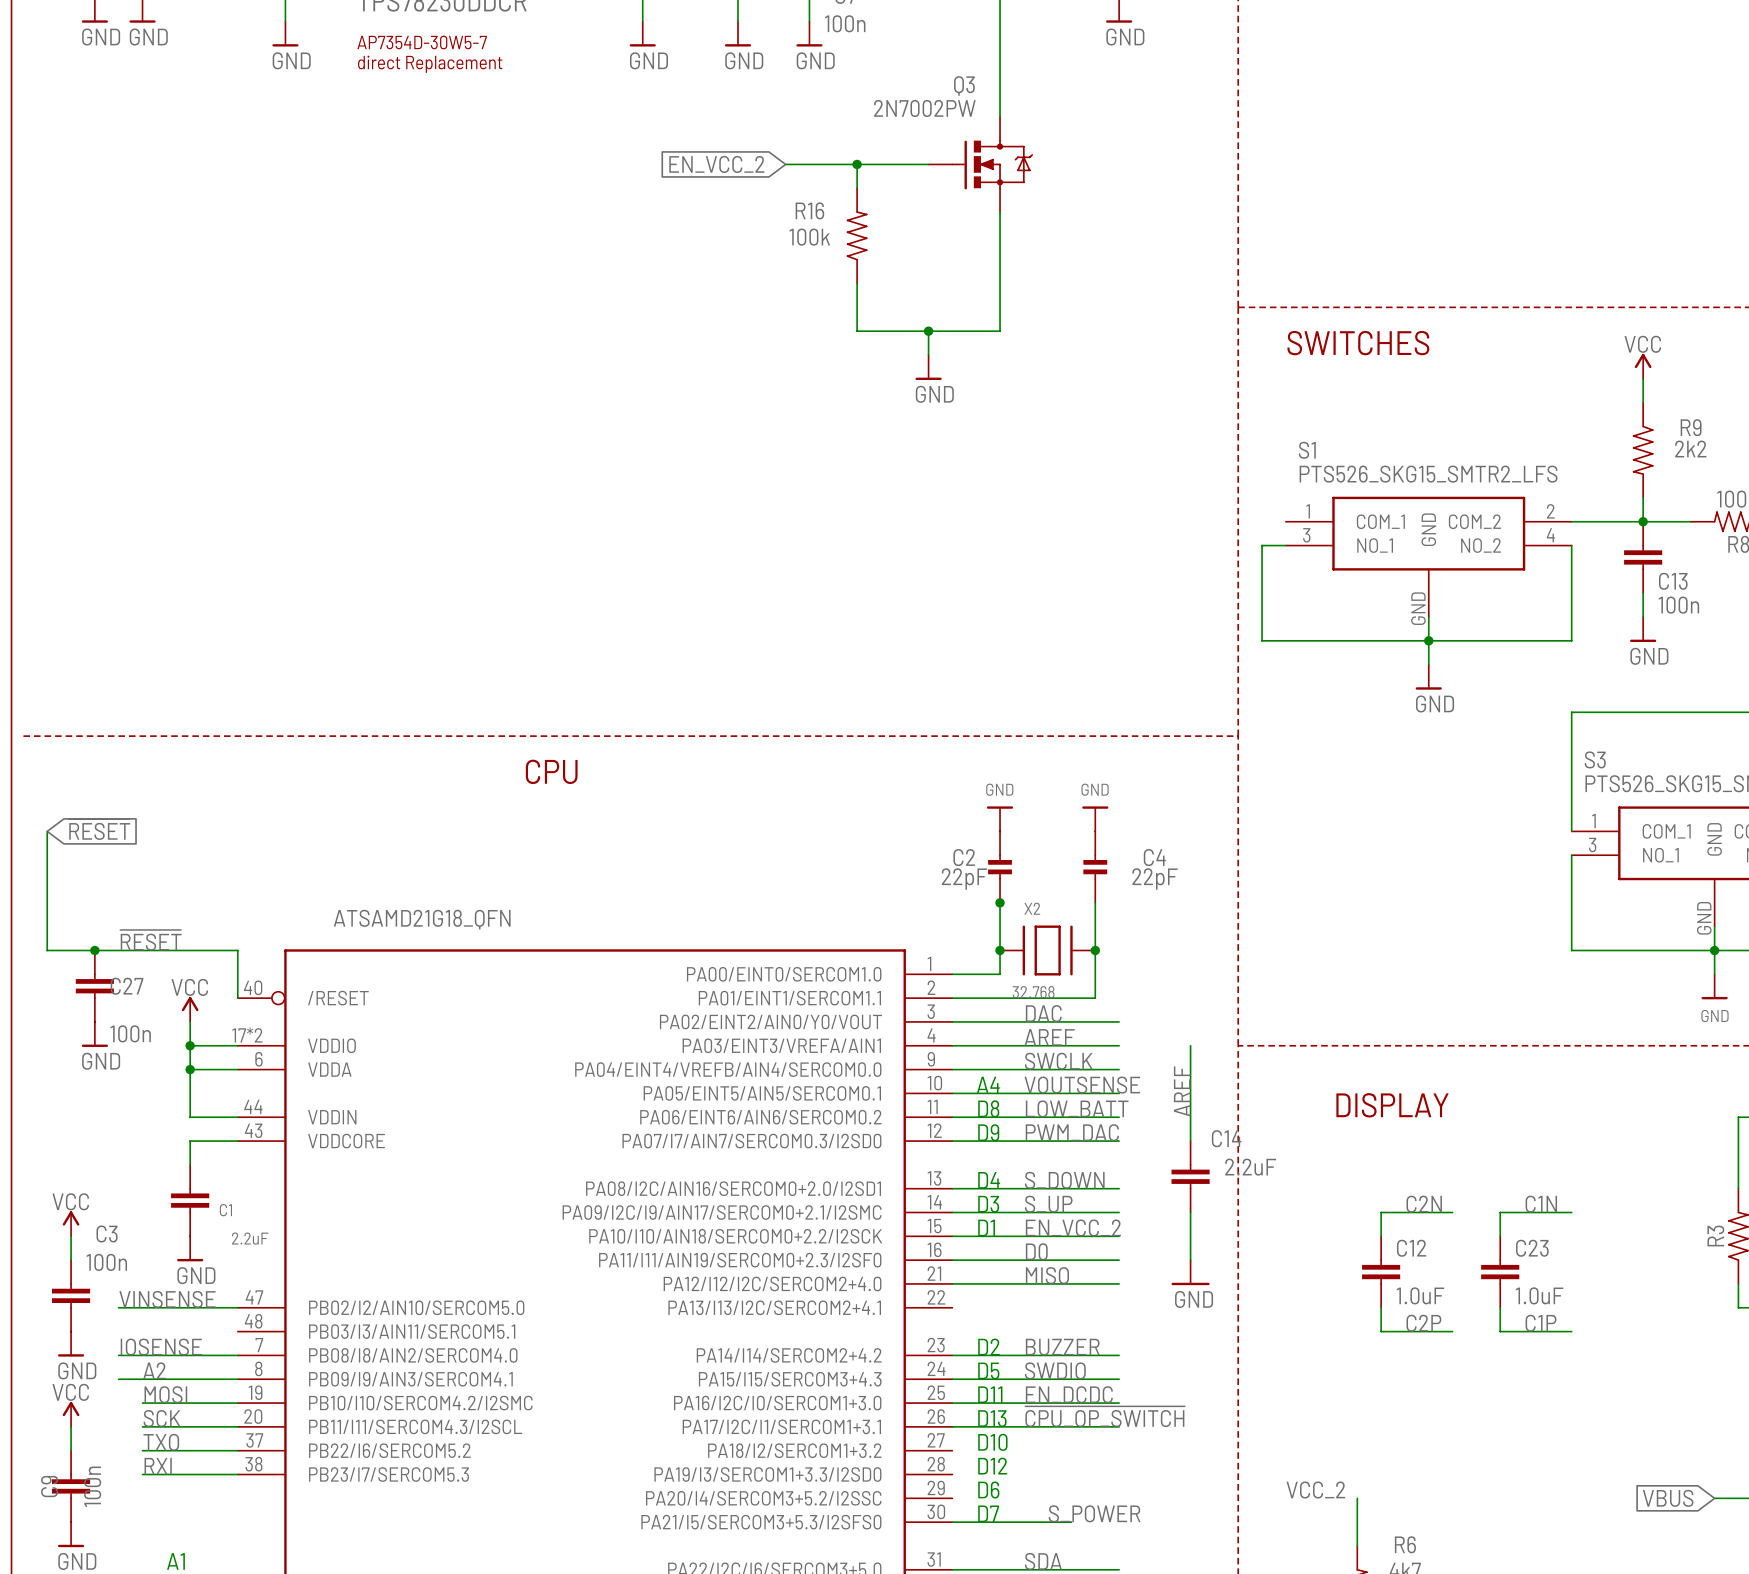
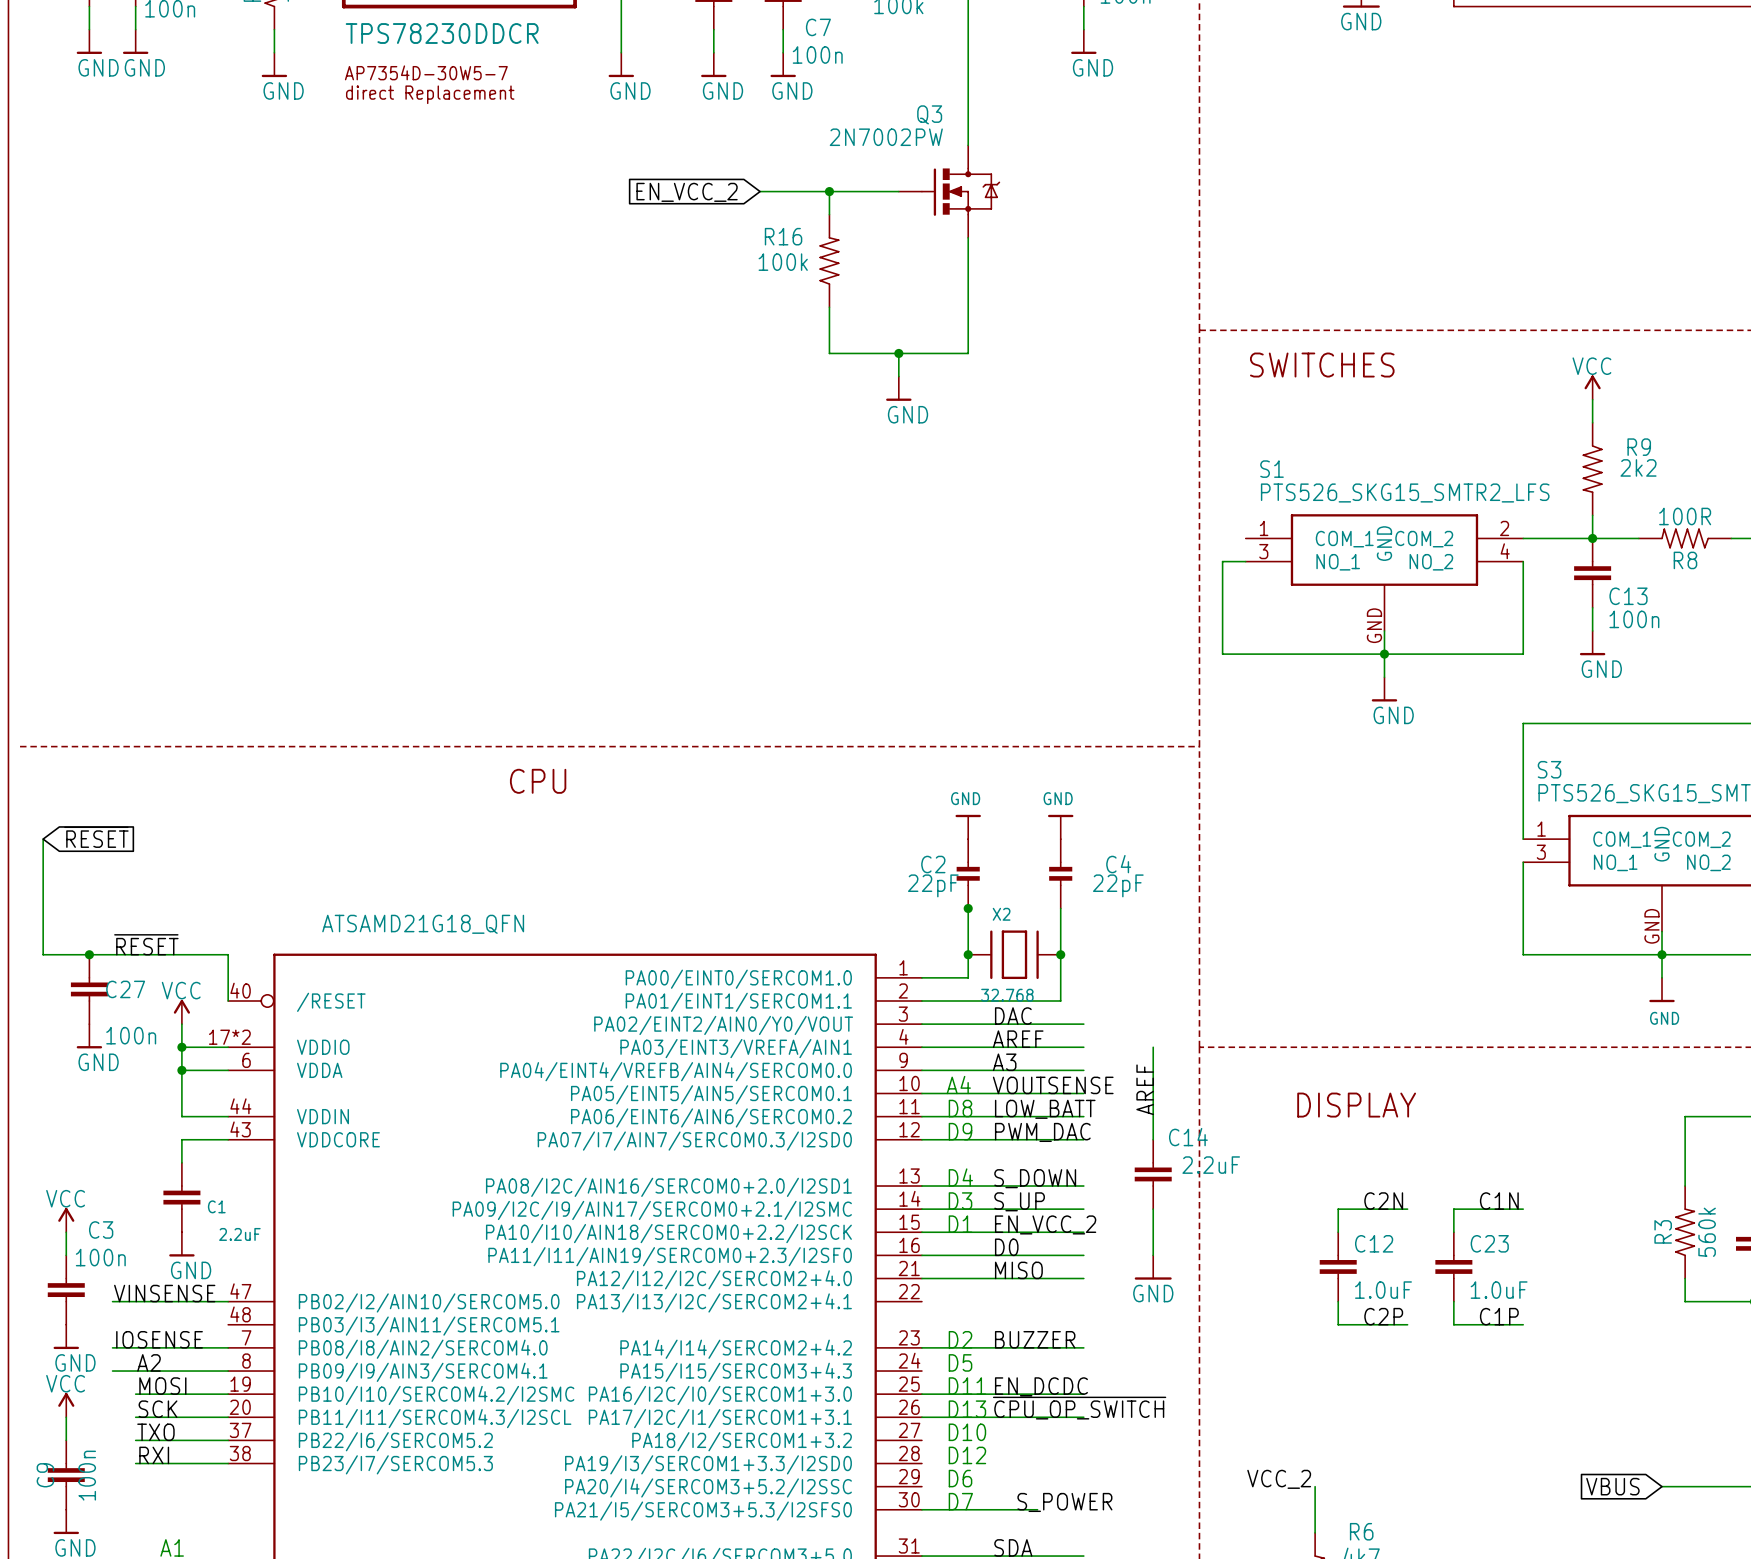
label: SWCLK (1058, 1061) -> A3 (1004, 1062)
label: SWDIO (1055, 1370) -> none
wire: (952, 1379) (1119, 1379) -> none

